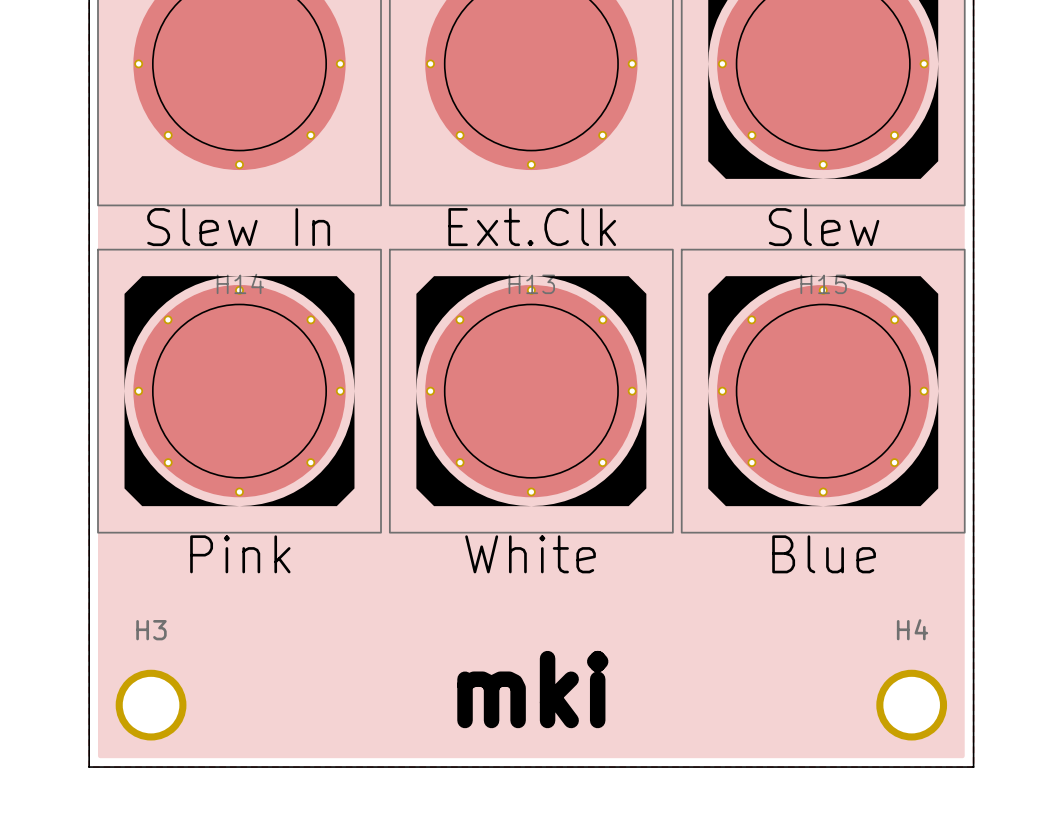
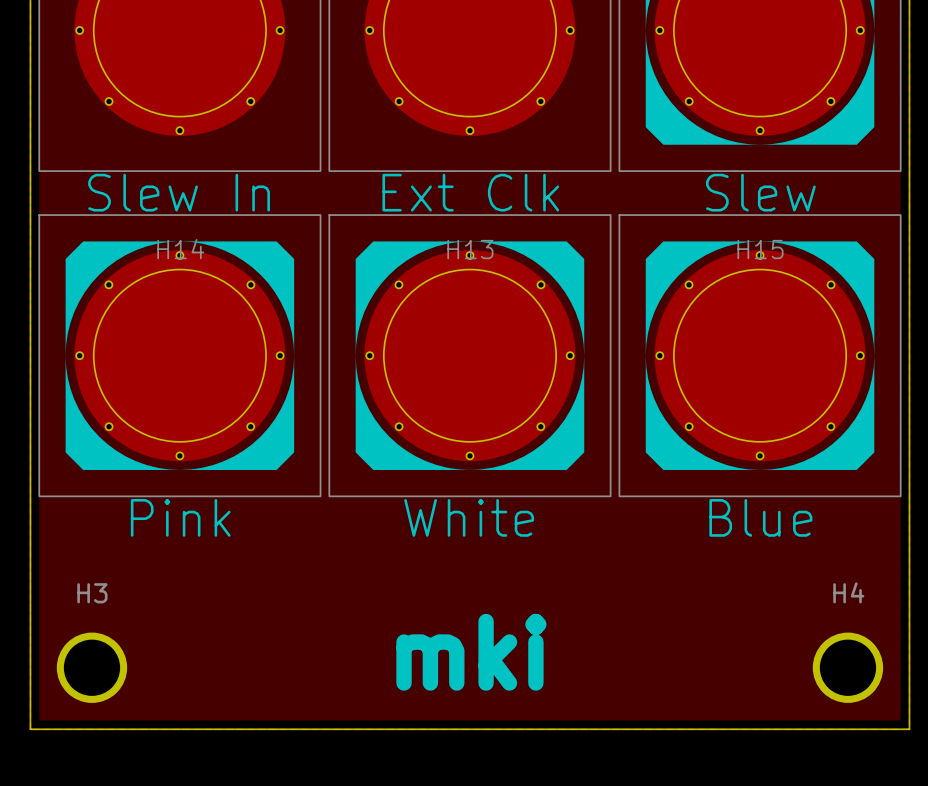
part value: Ext.Clk (532, 227) -> Ext Clk (470, 192)

